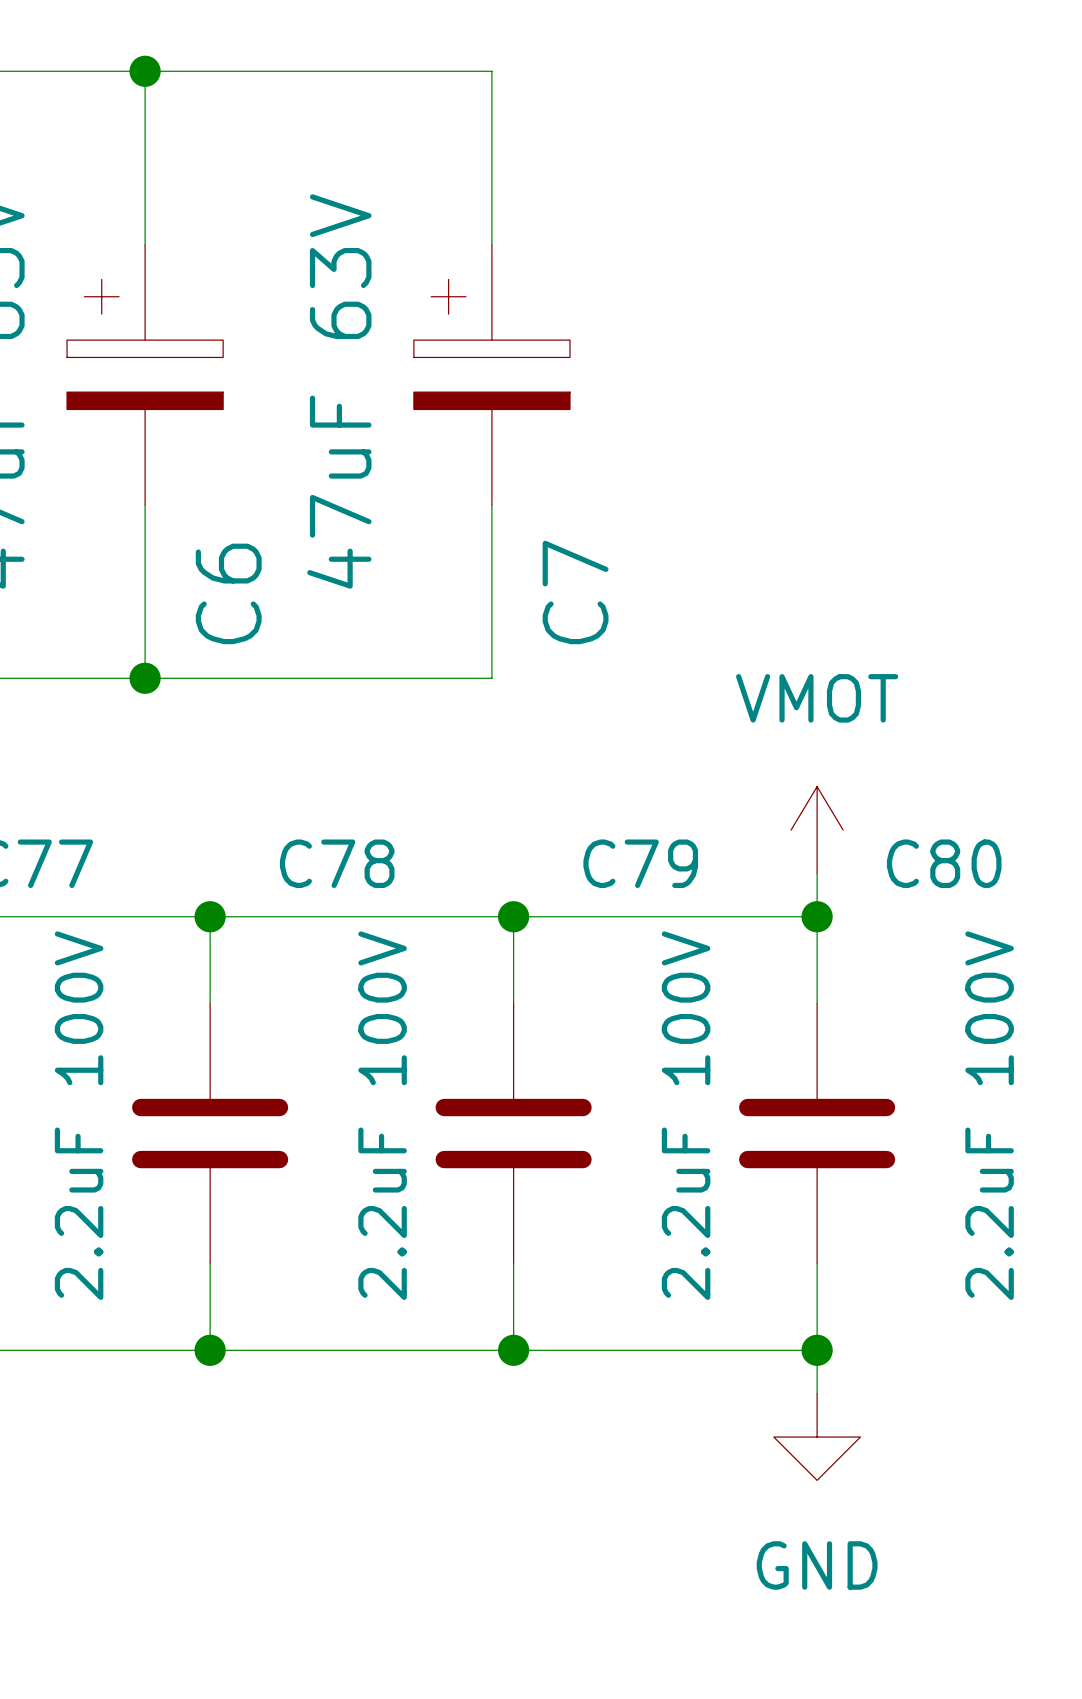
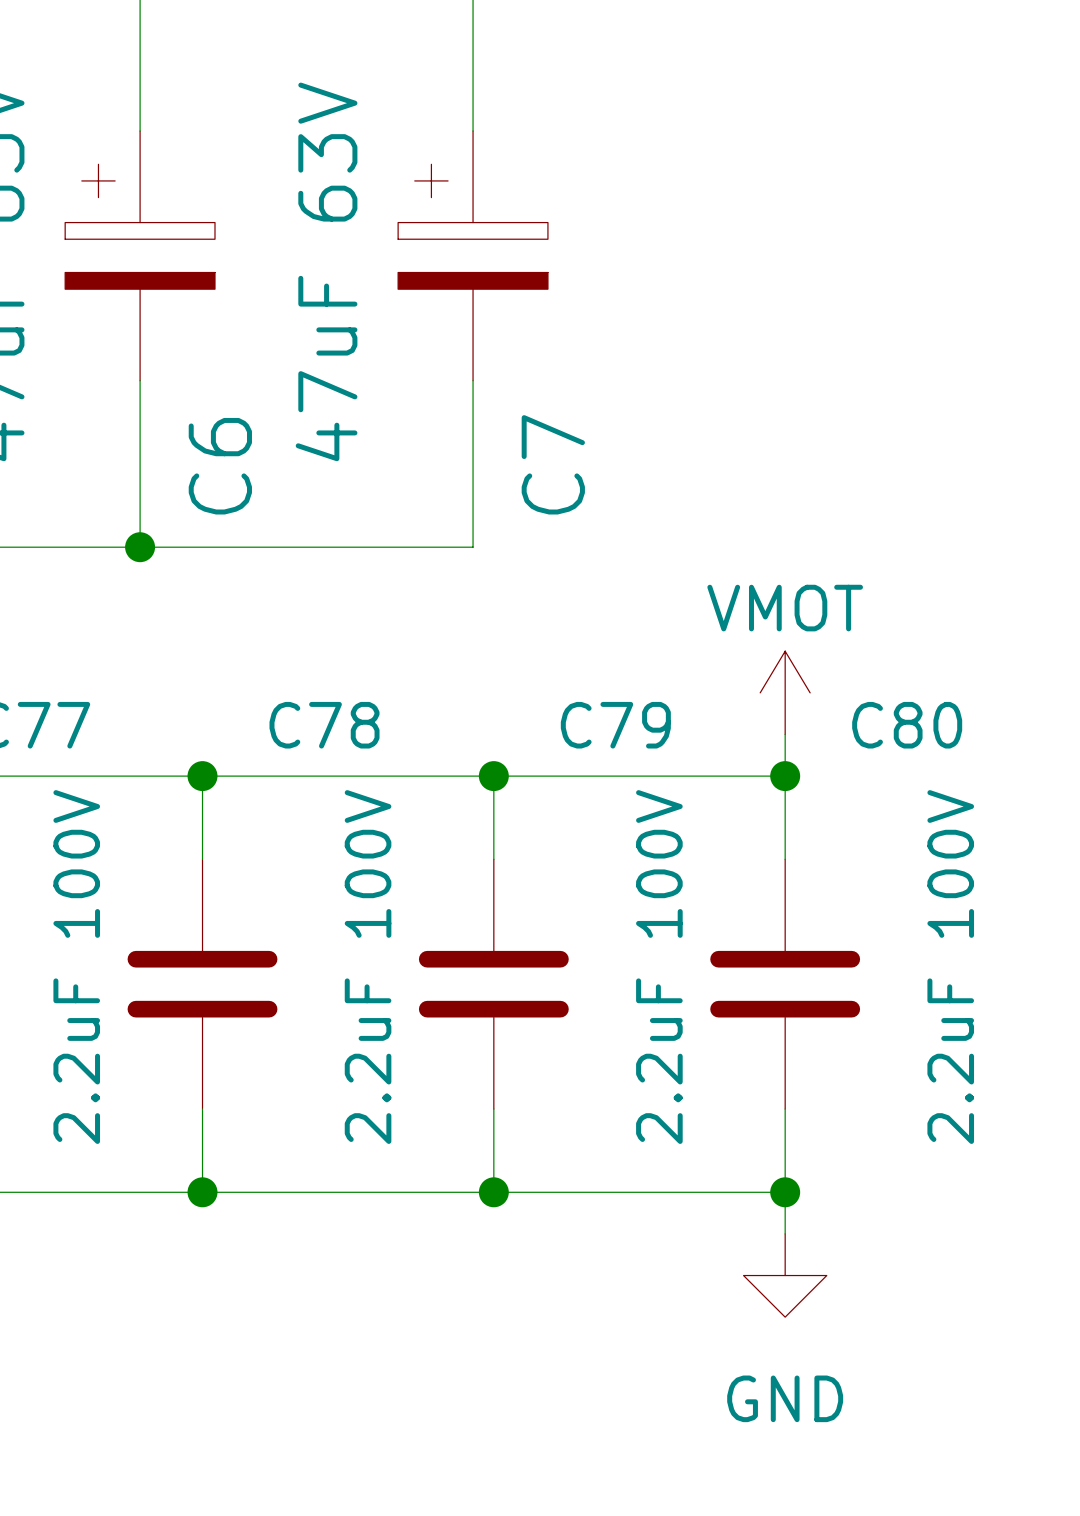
power symbol text position: VMOT (817, 698) -> VMOT (785, 608)

